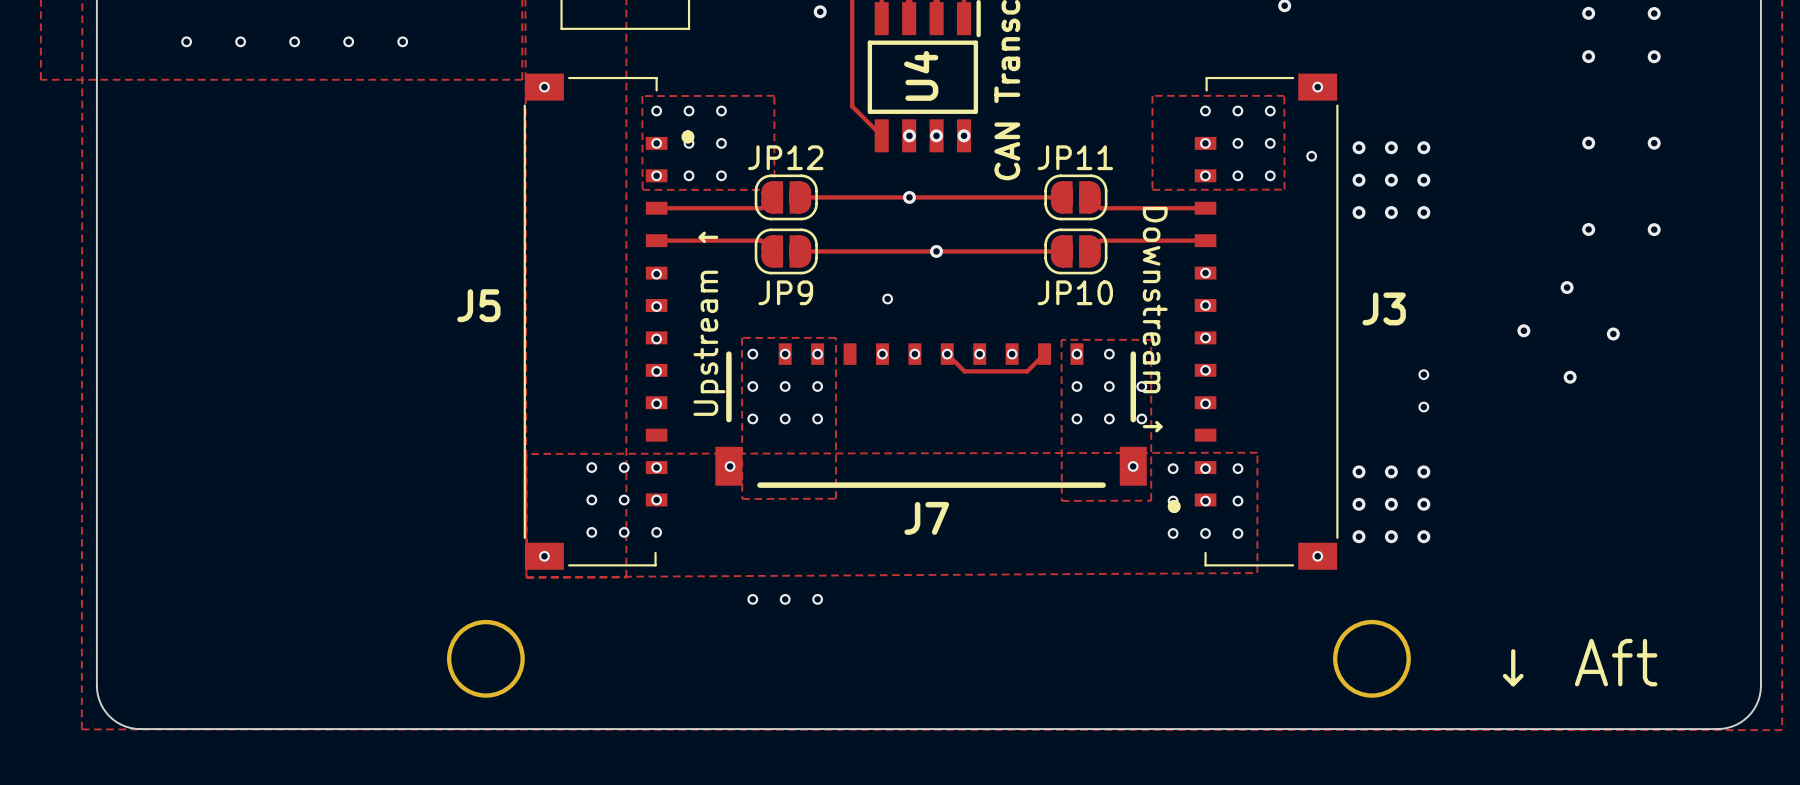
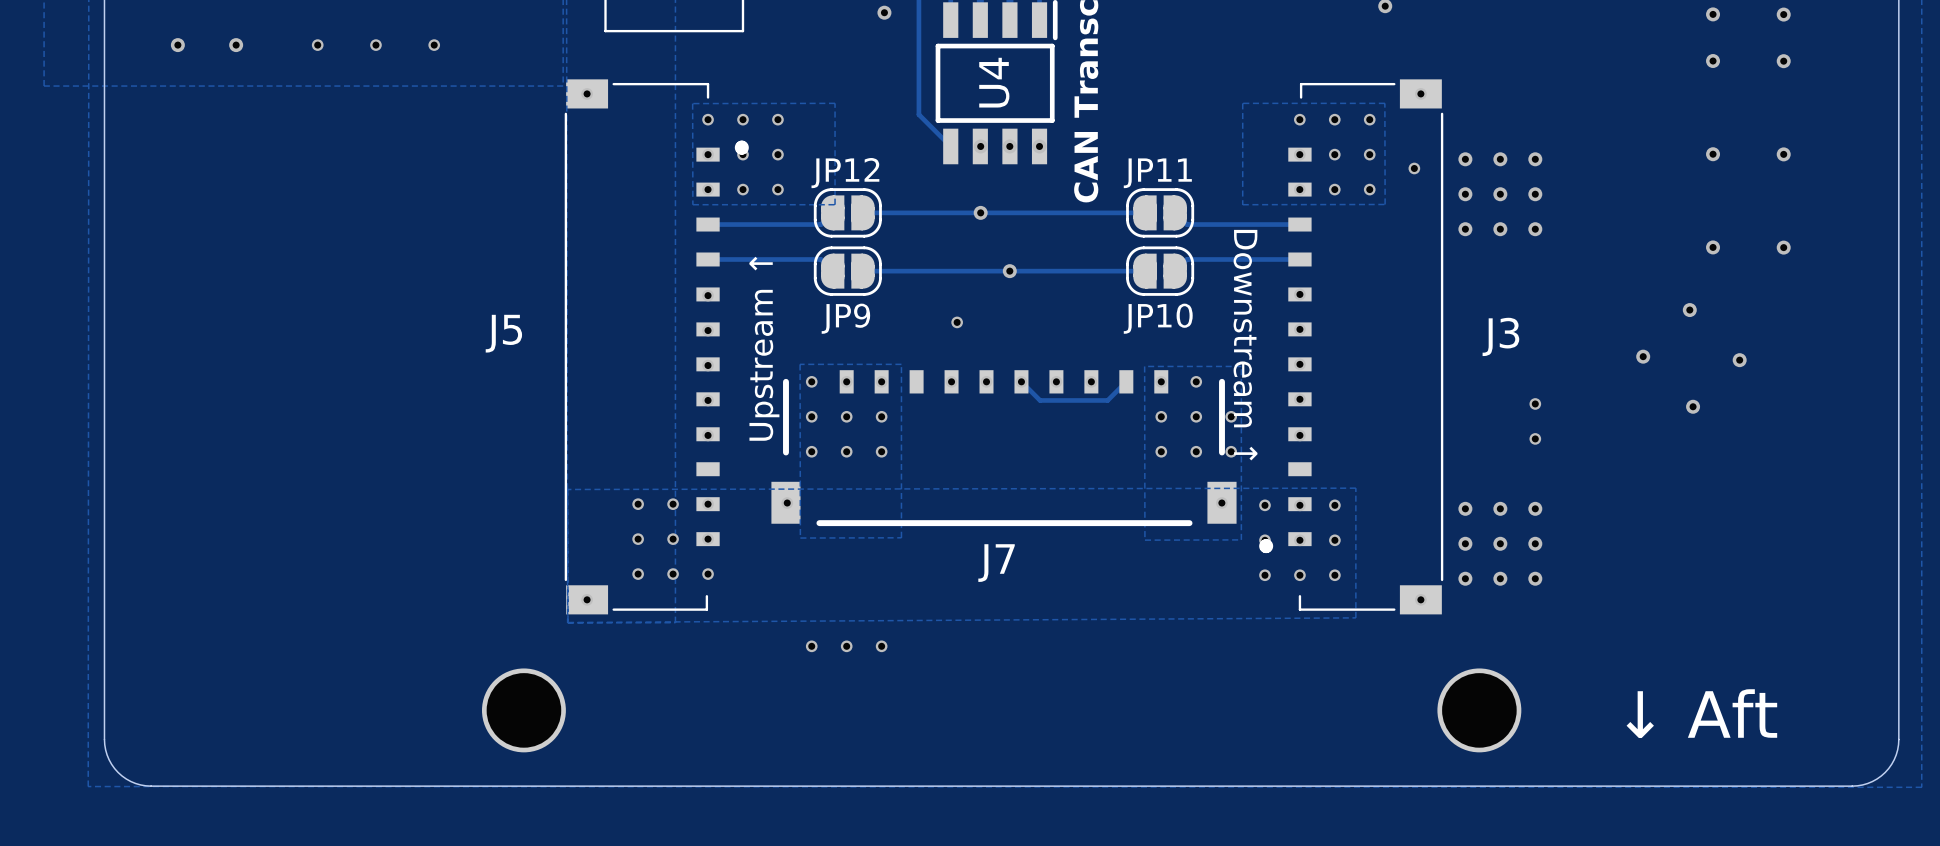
via: none -> (177, 45)
via: (186, 41) -> none
via: none -> (236, 45)
via: (240, 41) -> none

